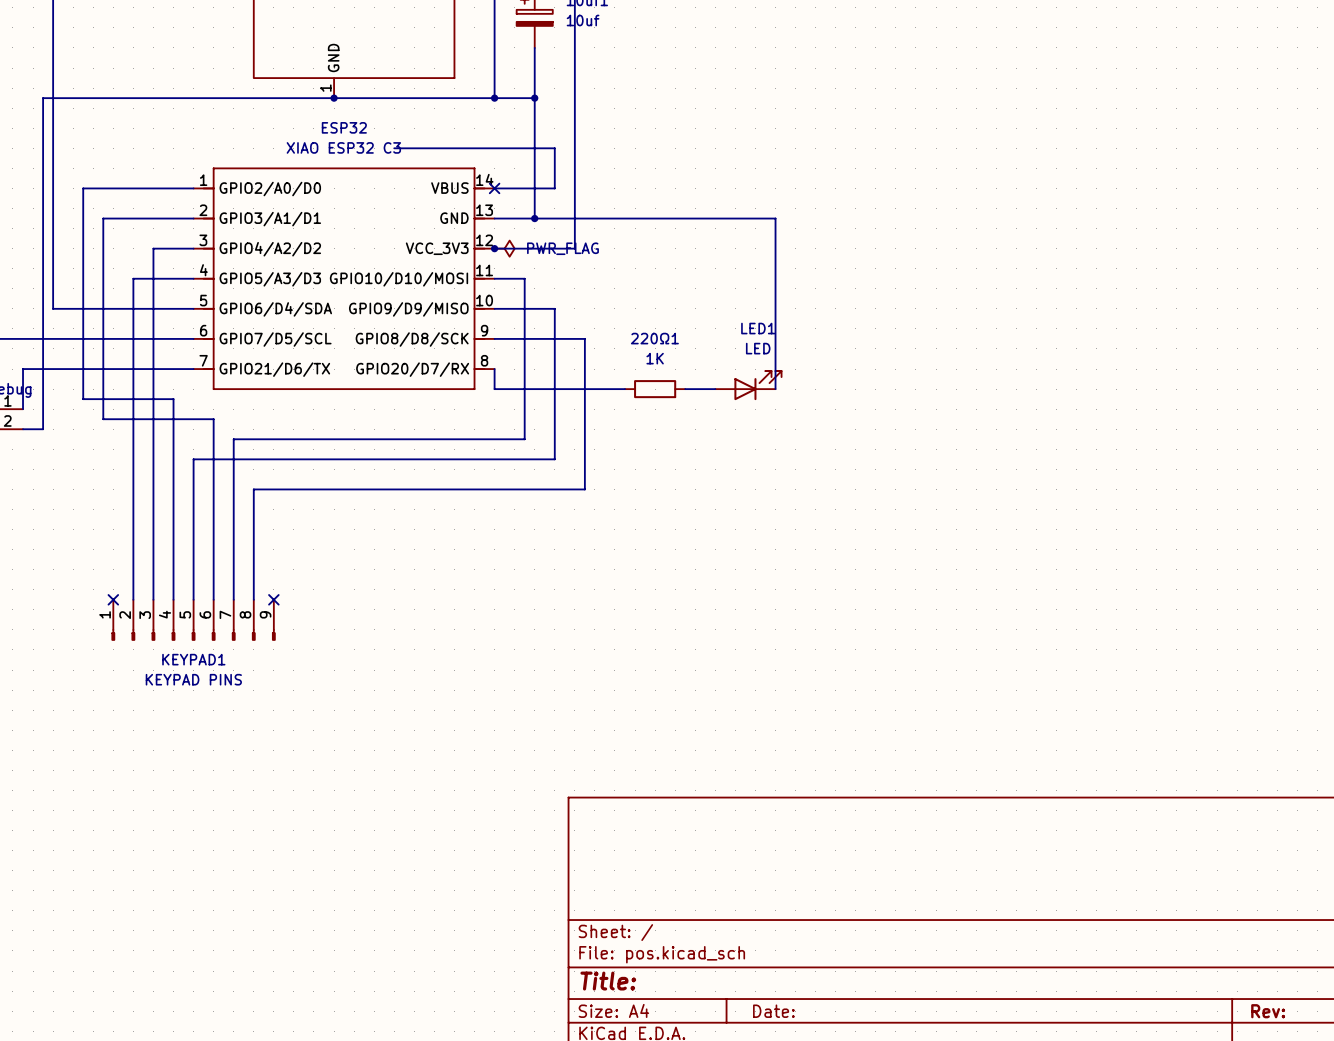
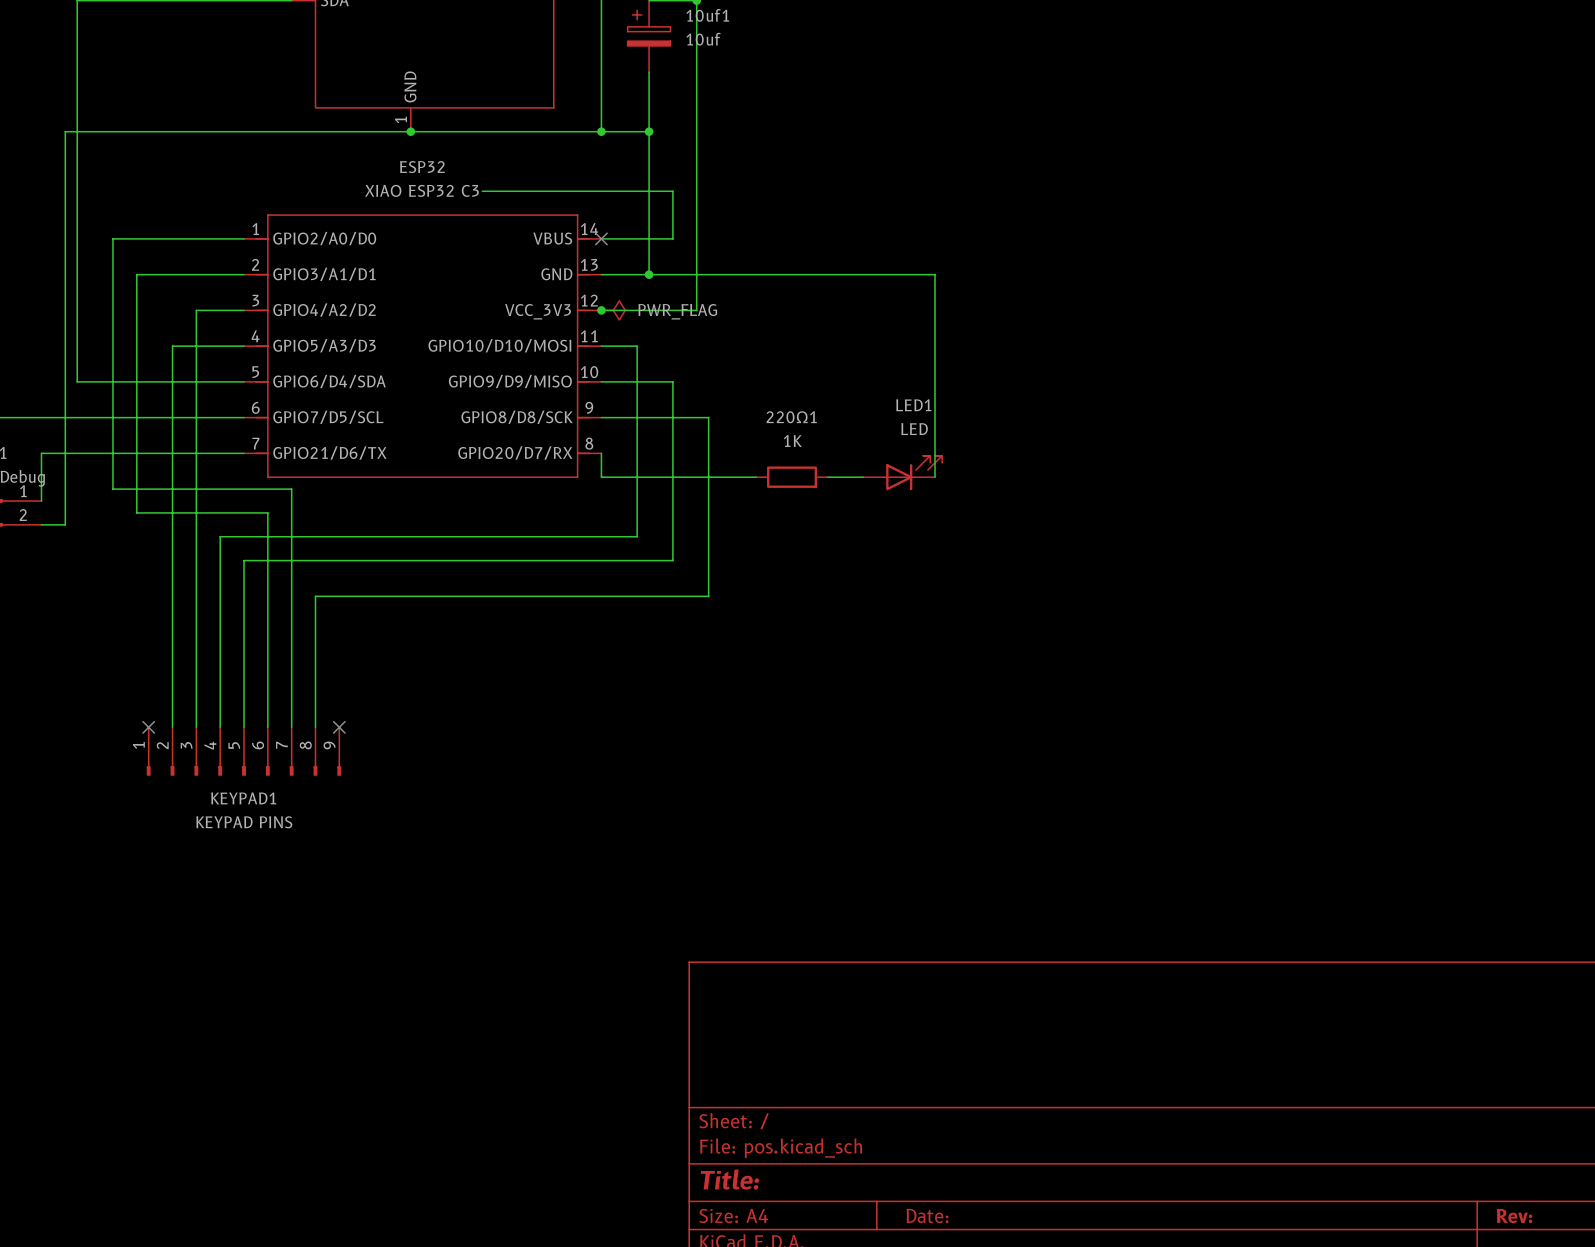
wire: (173, 399) (173, 439) -> (220, 489) (291, 489) (291, 536) (220, 536)

